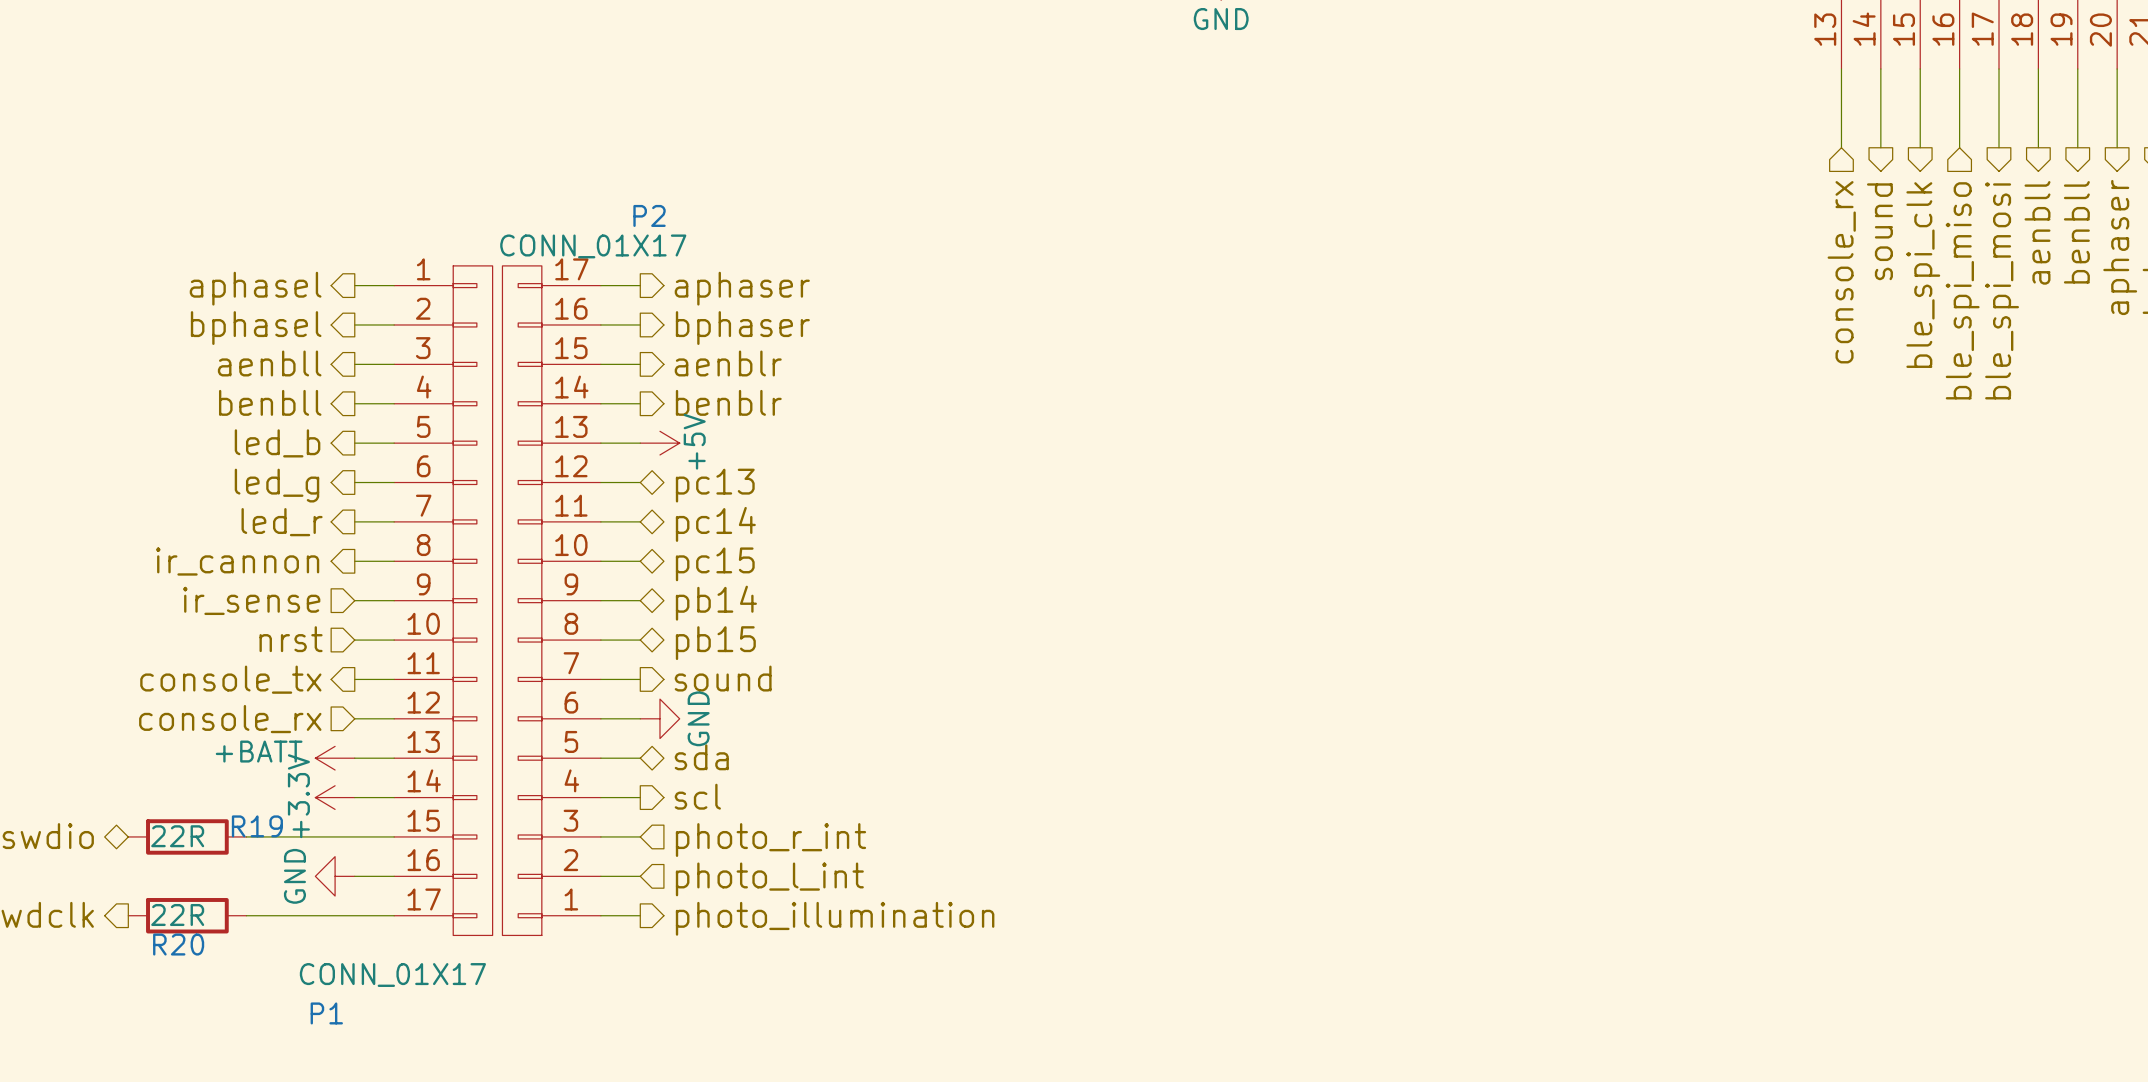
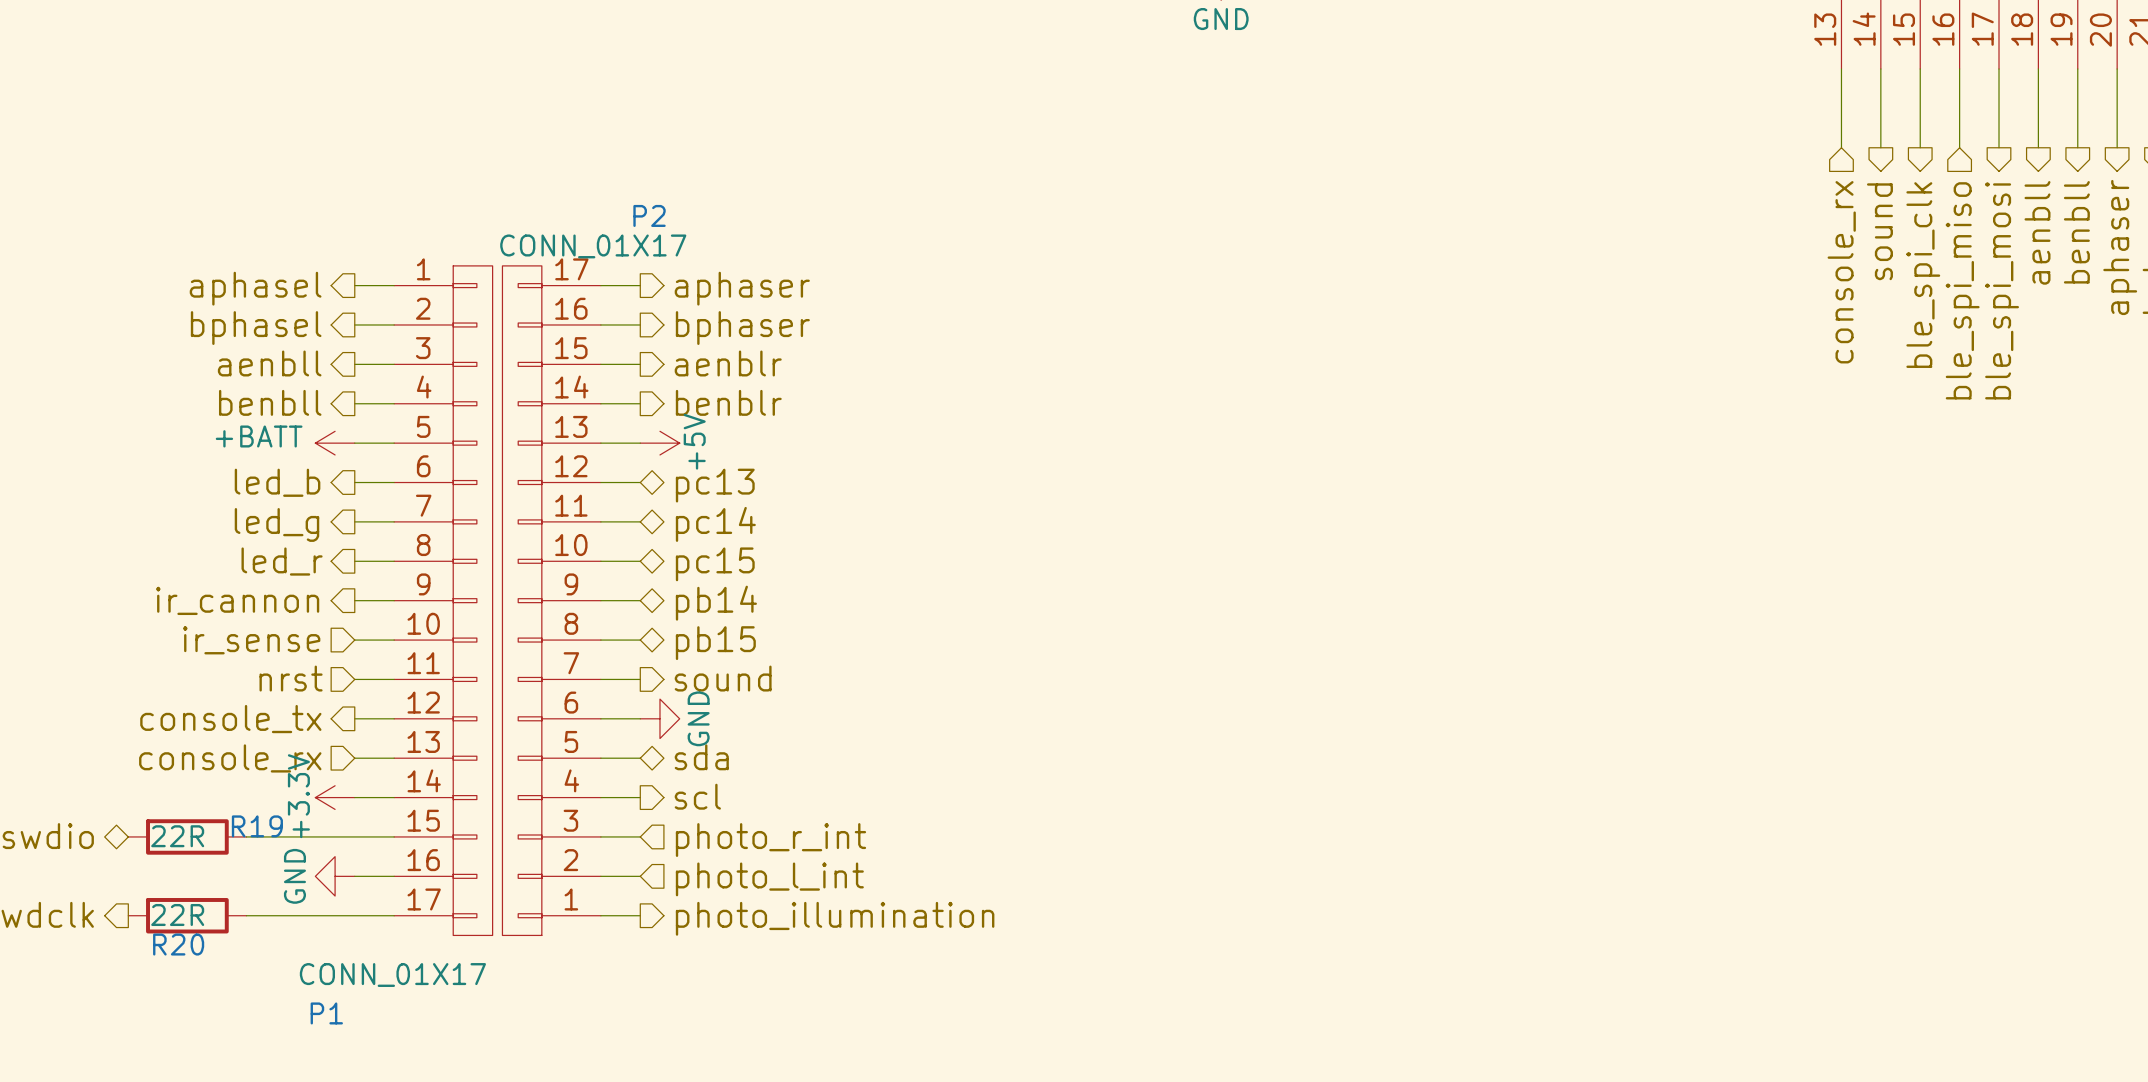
hierarchical label: led_b (277, 443) -> none
hierarchical label: led_g (276, 485) -> led_b (277, 482)
hierarchical label: led_r (282, 522) -> led_g (276, 524)
hierarchical label: ir_cannon (237, 561) -> led_r (282, 561)
hierarchical label shape: input (251, 600) -> output (237, 600)
hierarchical label: ir_sense (251, 600) -> ir_cannon (237, 600)
hierarchical label: nrst (291, 639) -> ir_sense (251, 640)
hierarchical label shape: output (230, 679) -> input (291, 678)
hierarchical label: console_tx (230, 679) -> nrst (291, 678)
hierarchical label shape: input (230, 719) -> output (230, 719)
hierarchical label: console_rx (230, 719) -> console_tx (230, 719)
hierarchical label: none -> console_rx (230, 758)
power symbol position: +BATT (335, 758) -> +BATT (335, 443)

